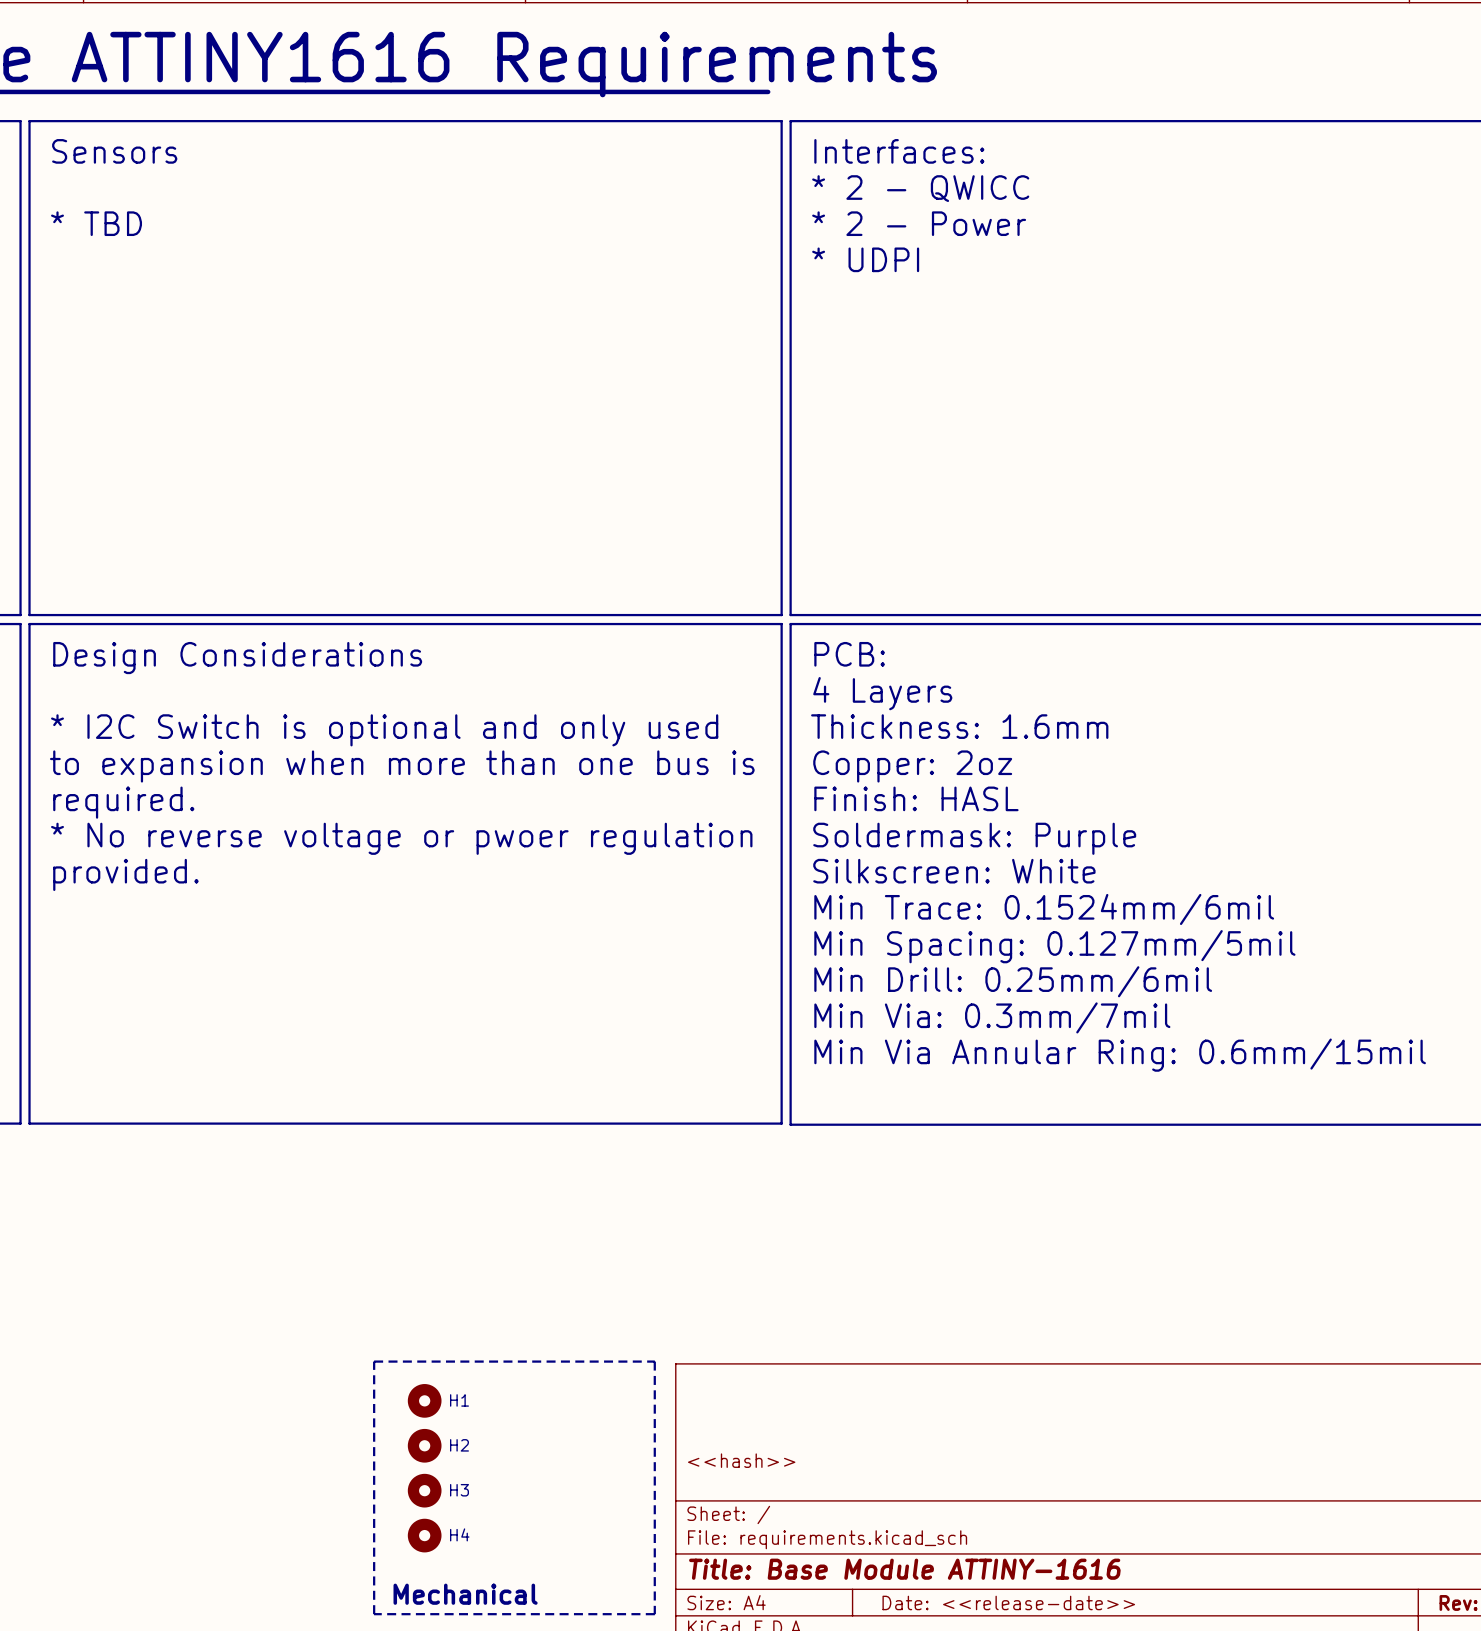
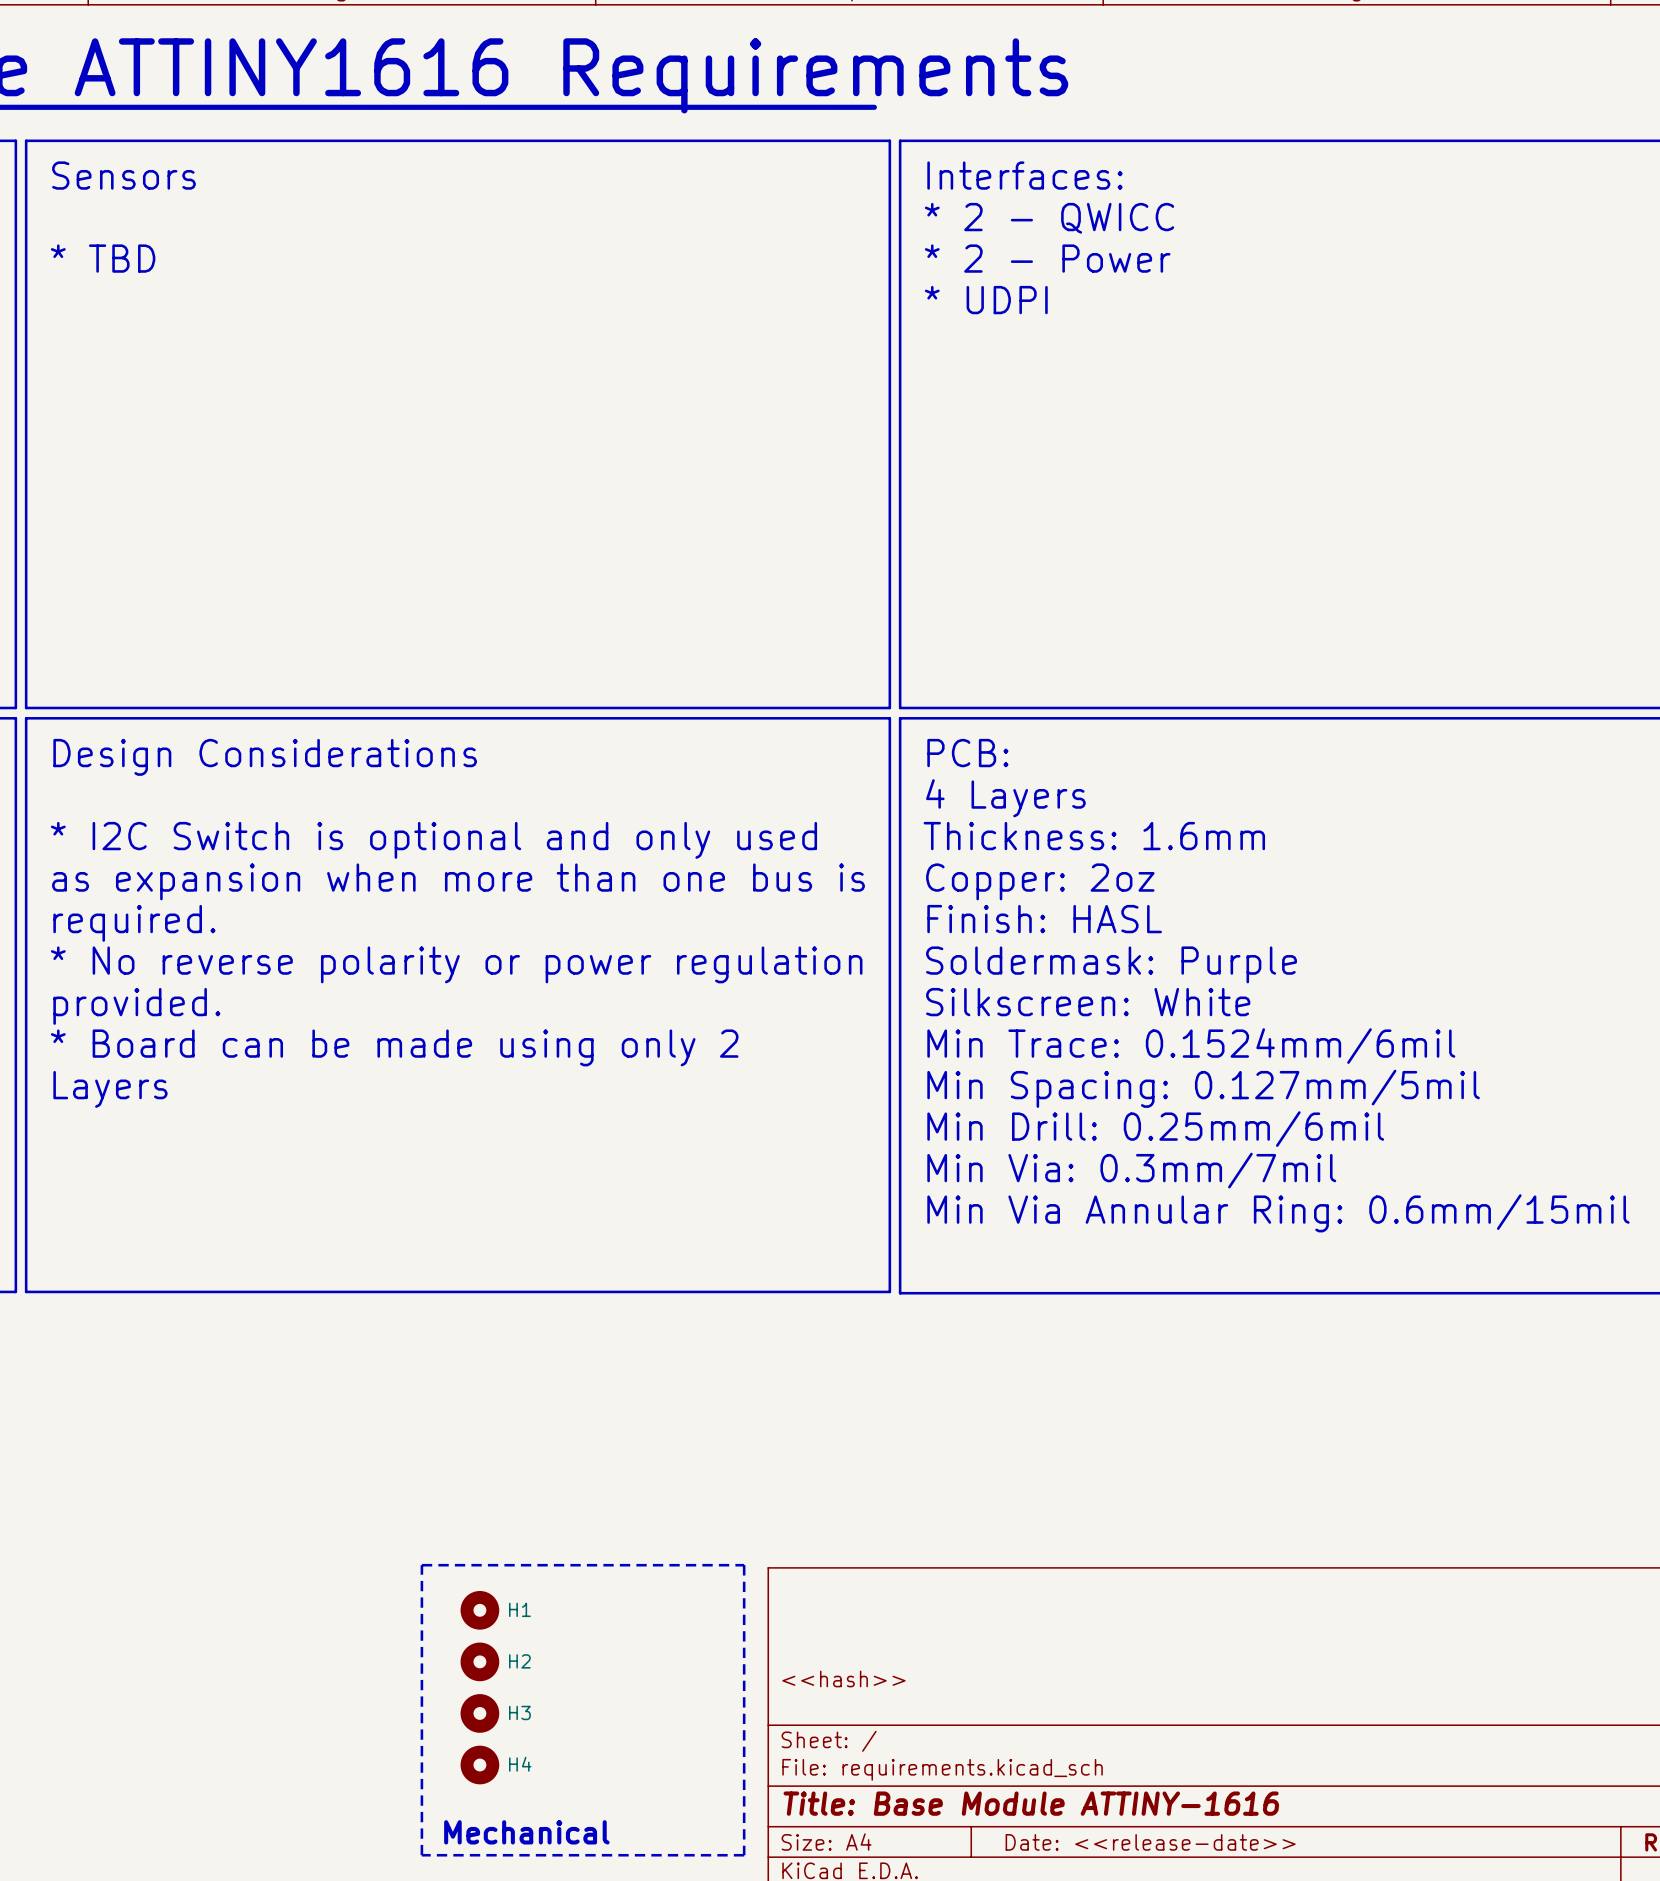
text: to expansion when more than one bus is (402, 766) -> as expansion when more than one bus is (458, 881)
text: * No reverse voltage or pwoer regulation (401, 838) -> * No reverse polarity or power regulation (456, 964)
text: none -> * Board can be made using only 2 (394, 1047)
text: none -> Layers (110, 1089)

